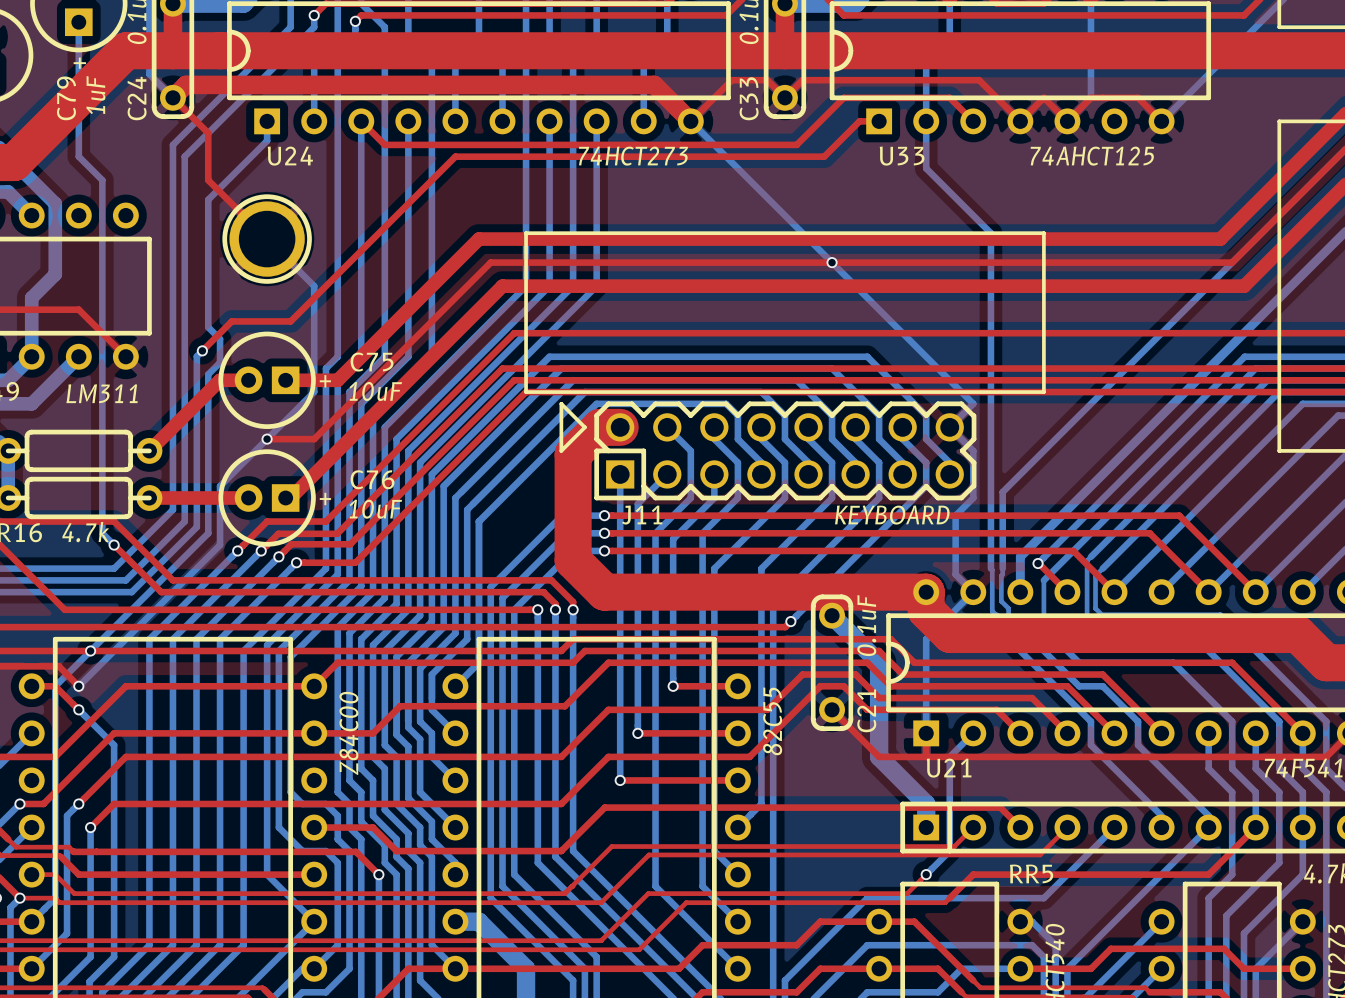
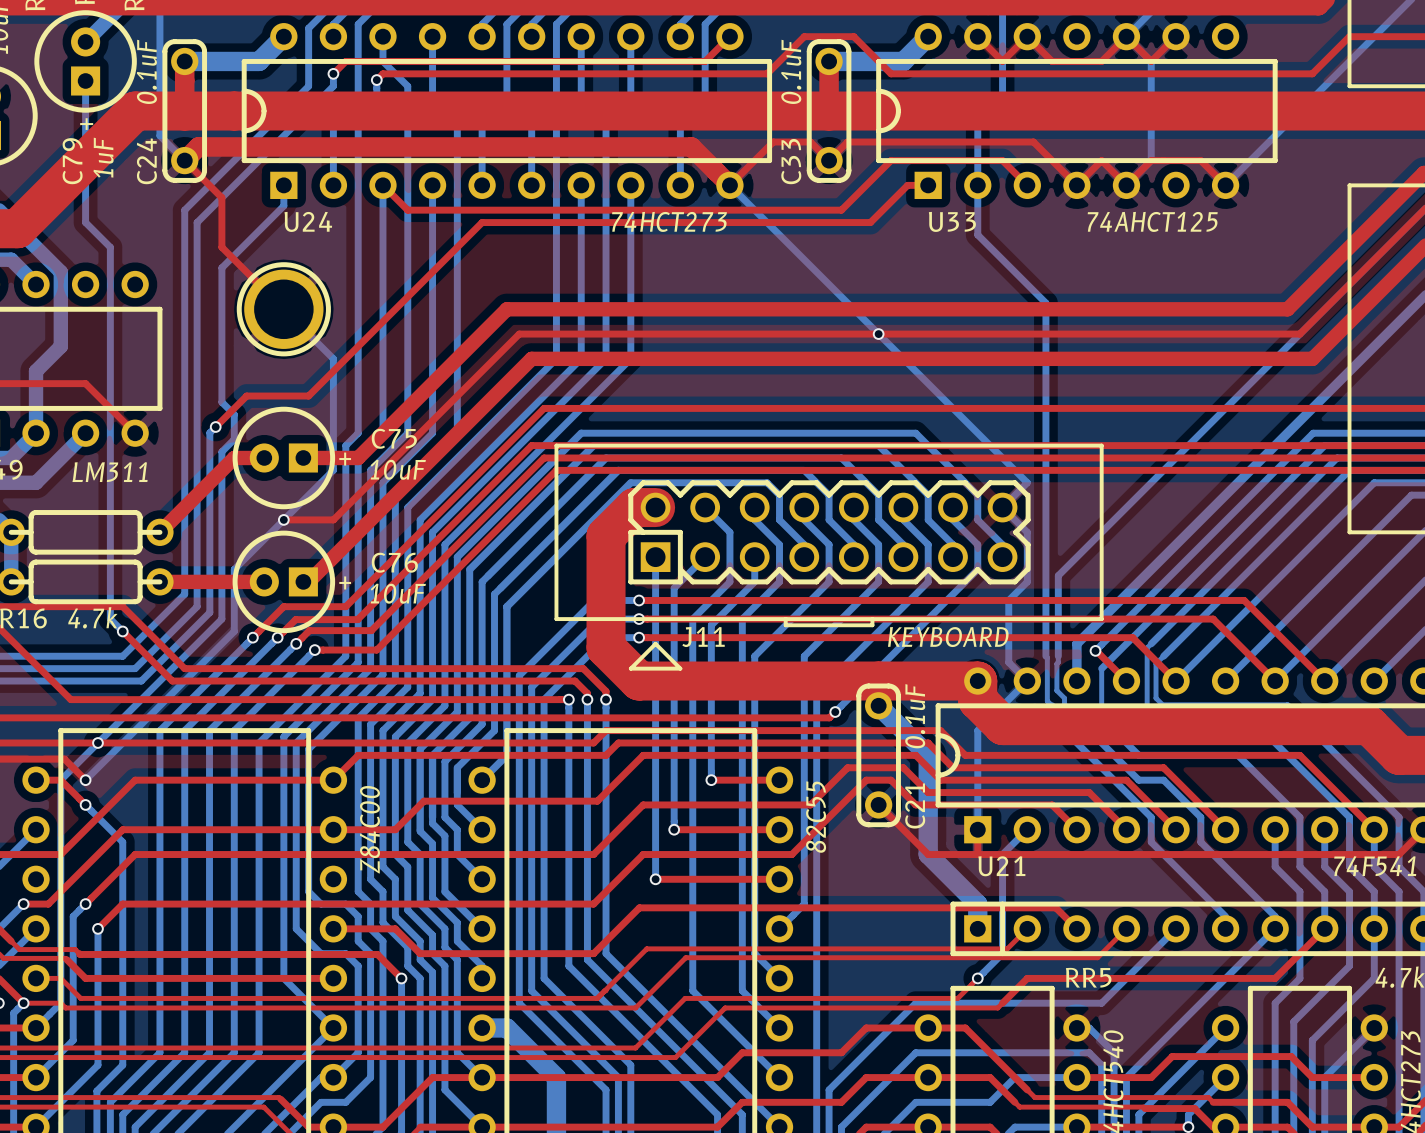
line: (526, 368) (526, 233) (1043, 233) (1043, 368) -> (556, 445) (1101, 445)
line: (526, 392) (1043, 392) -> (556, 470) (556, 619) (1101, 619) (1101, 470)
line: (561, 403) (561, 450) (584, 427) (561, 403) -> none
J11 name position: J11 (642, 515) -> J11 (703, 637)
J11 value position: KEYBOARD (892, 515) -> KEYBOARD (948, 637)
line: none -> (785, 619) (785, 625) (872, 625) (872, 619)
line: none -> (655, 643) (680, 668) (630, 668) (655, 643)

